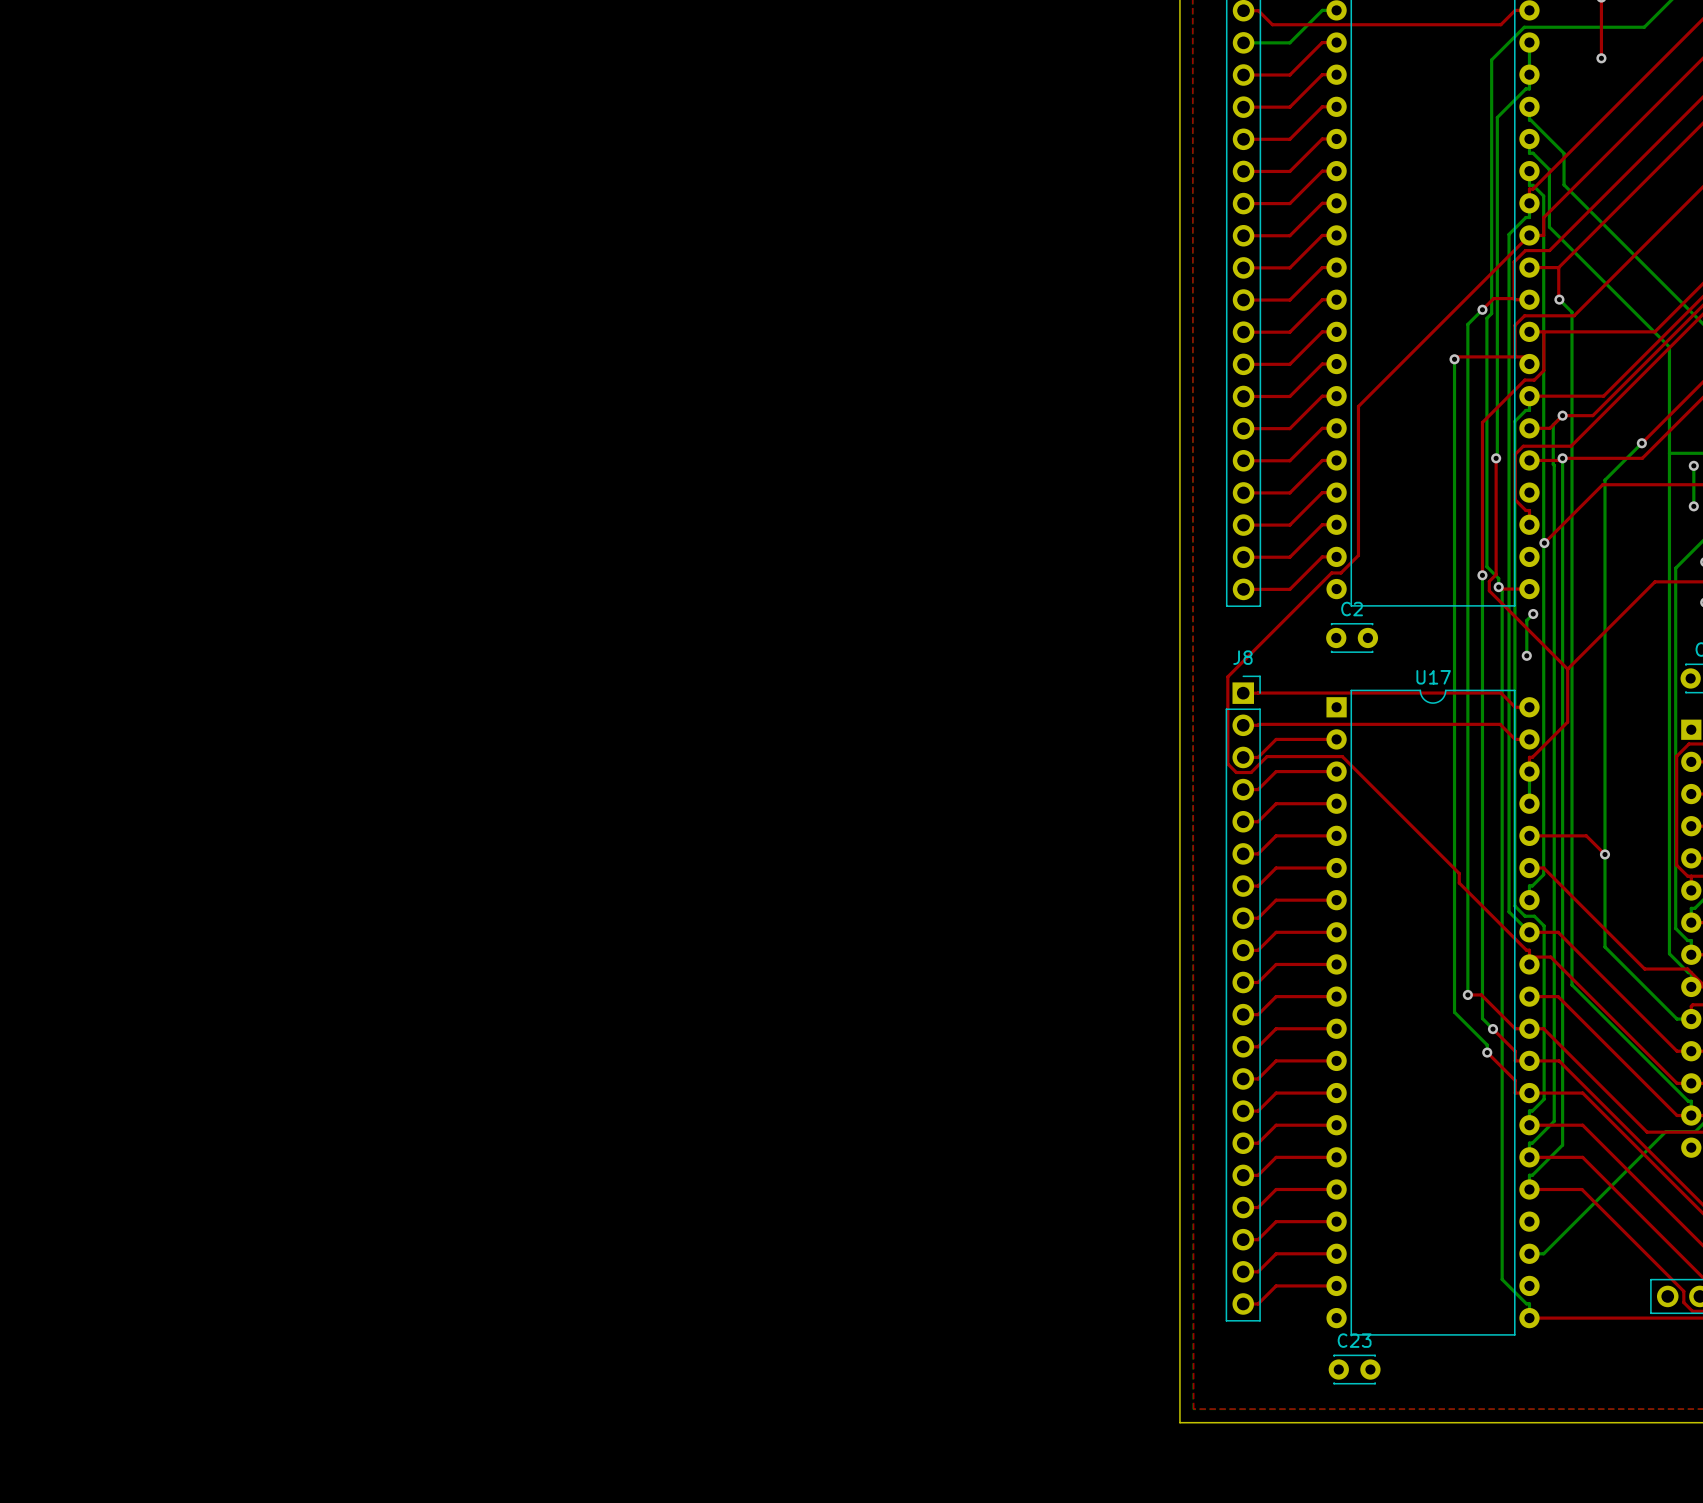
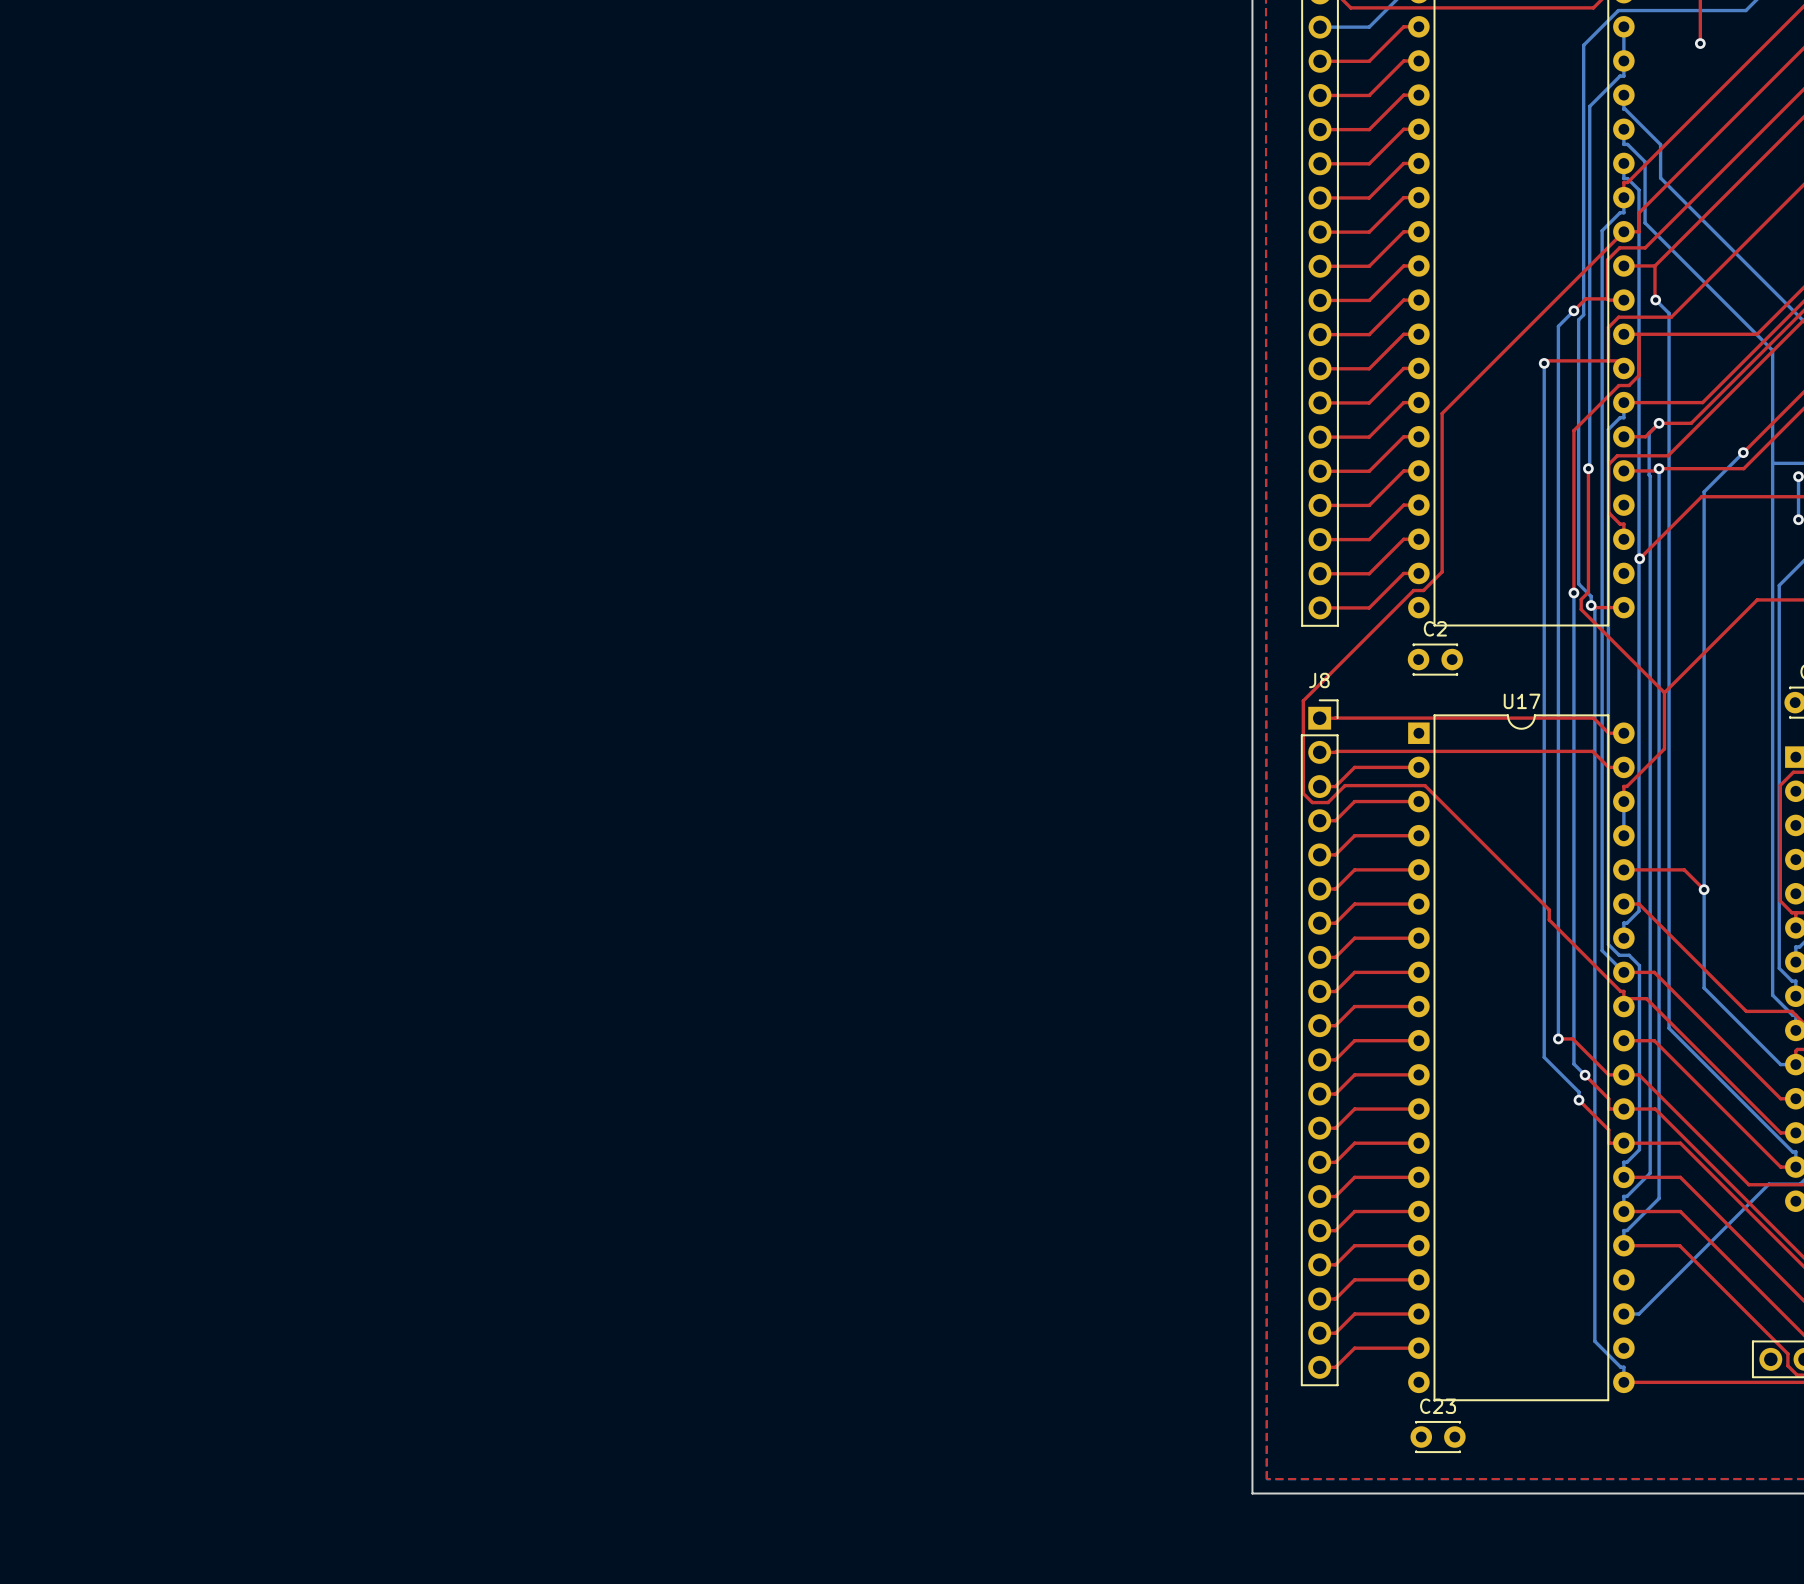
bottom track: (1533, 614) (1526, 620) (1526, 655) -> none
via: (1533, 614) -> none
via: (1526, 655) -> none

